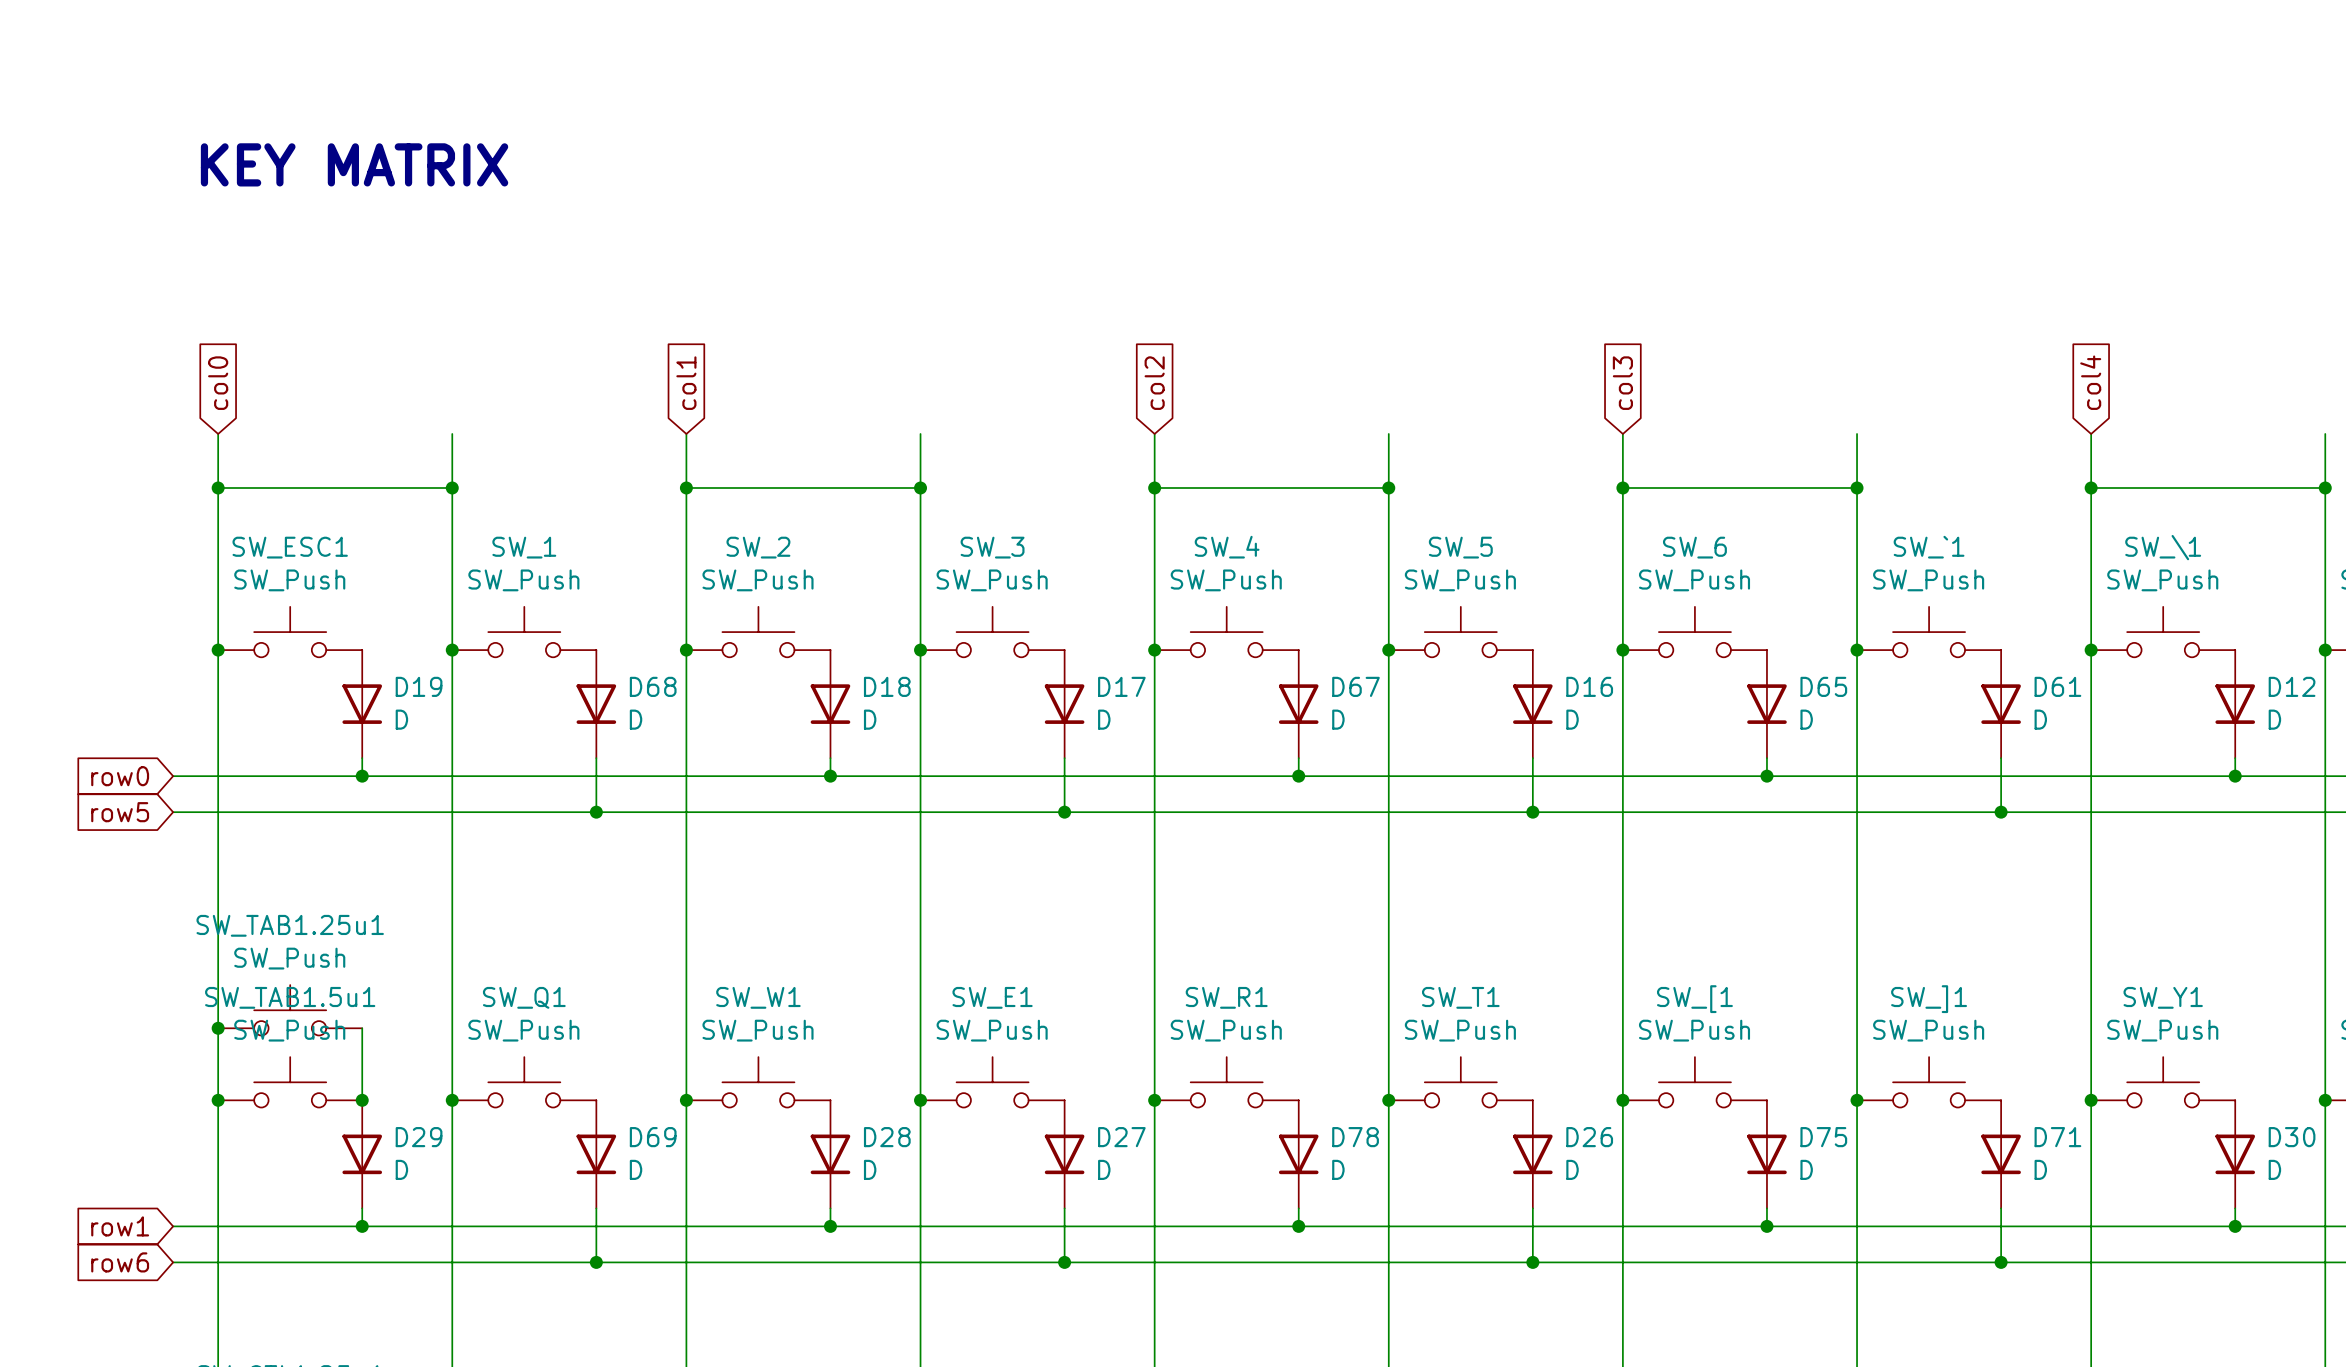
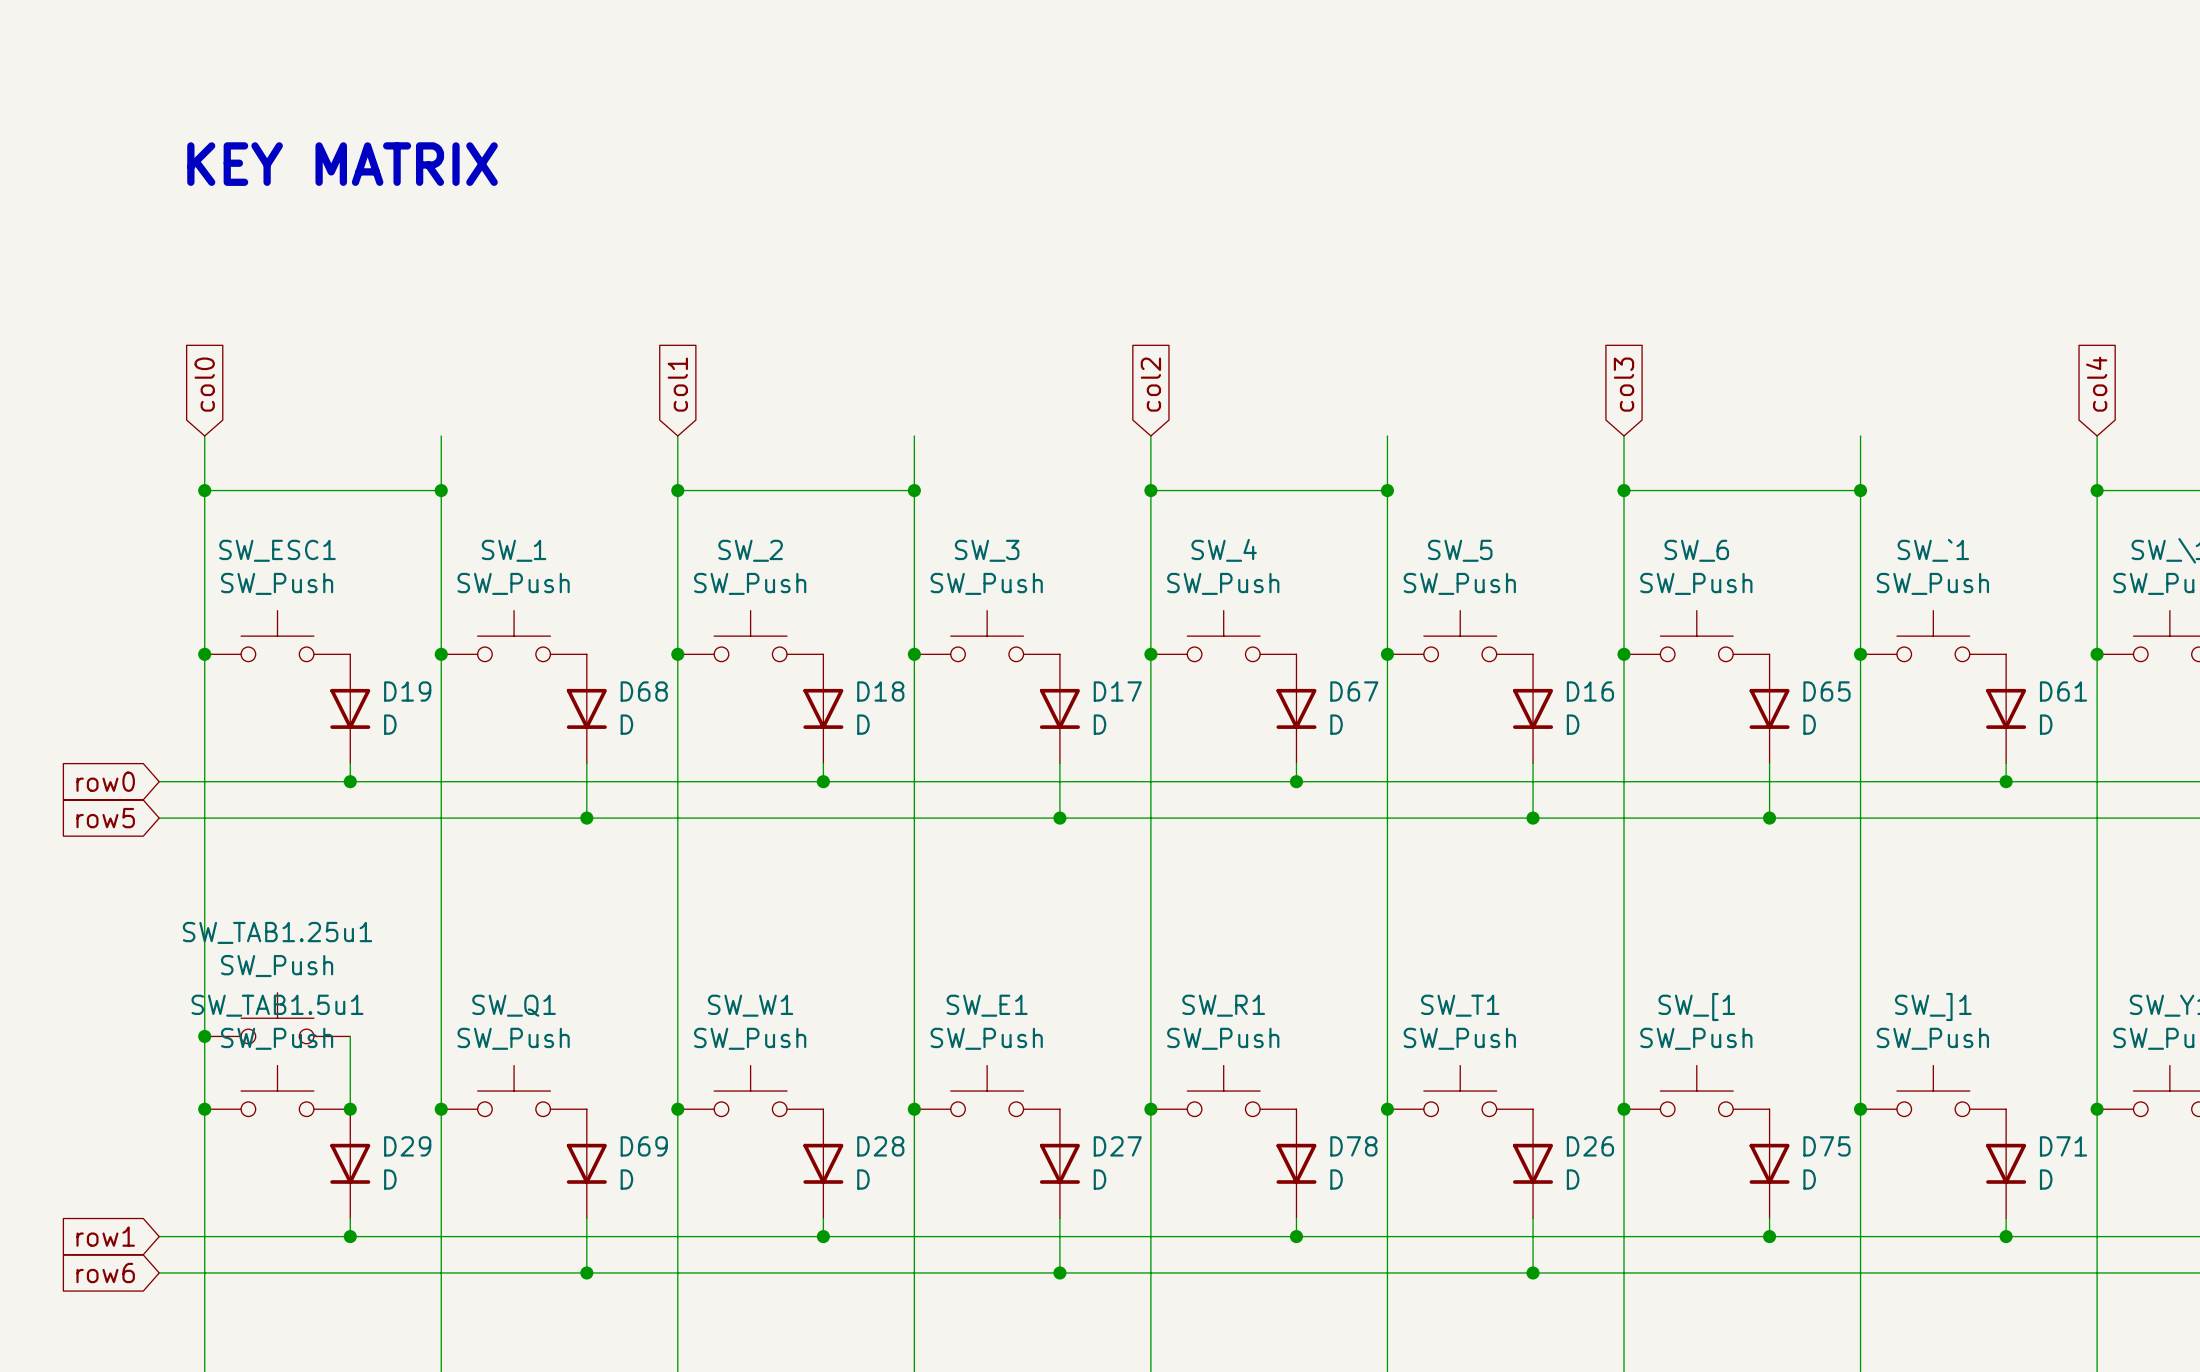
junction position: (1766, 776) -> (1769, 818)
wire: (2001, 776) (2001, 812) -> (1769, 781) (1769, 818)
junction position: (2001, 812) -> (2006, 781)
wire: (2001, 1226) (2001, 1262) -> none
junction position: (2001, 1262) -> (2006, 1236)

